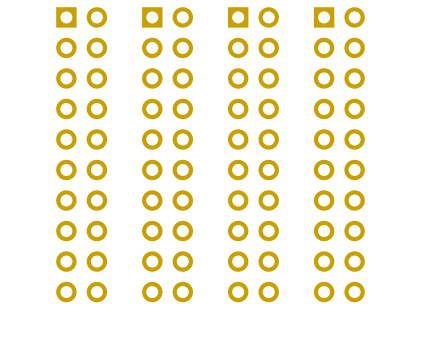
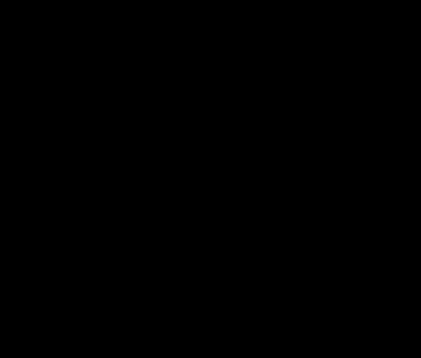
part: (81, 154) -> none
part: (167, 154) -> none
part: (253, 154) -> none
part: (339, 154) -> none

